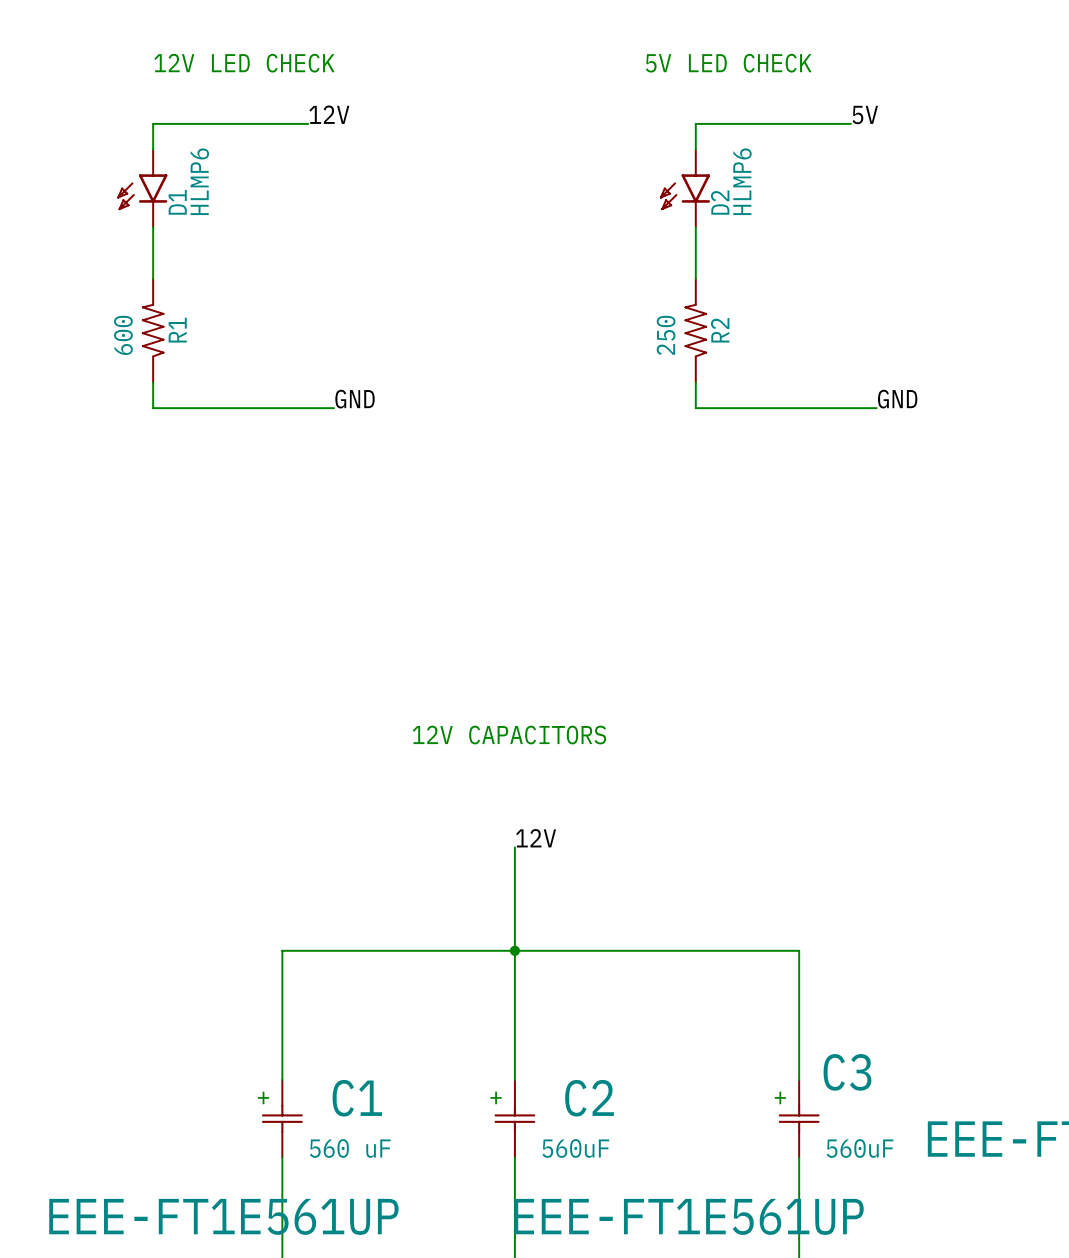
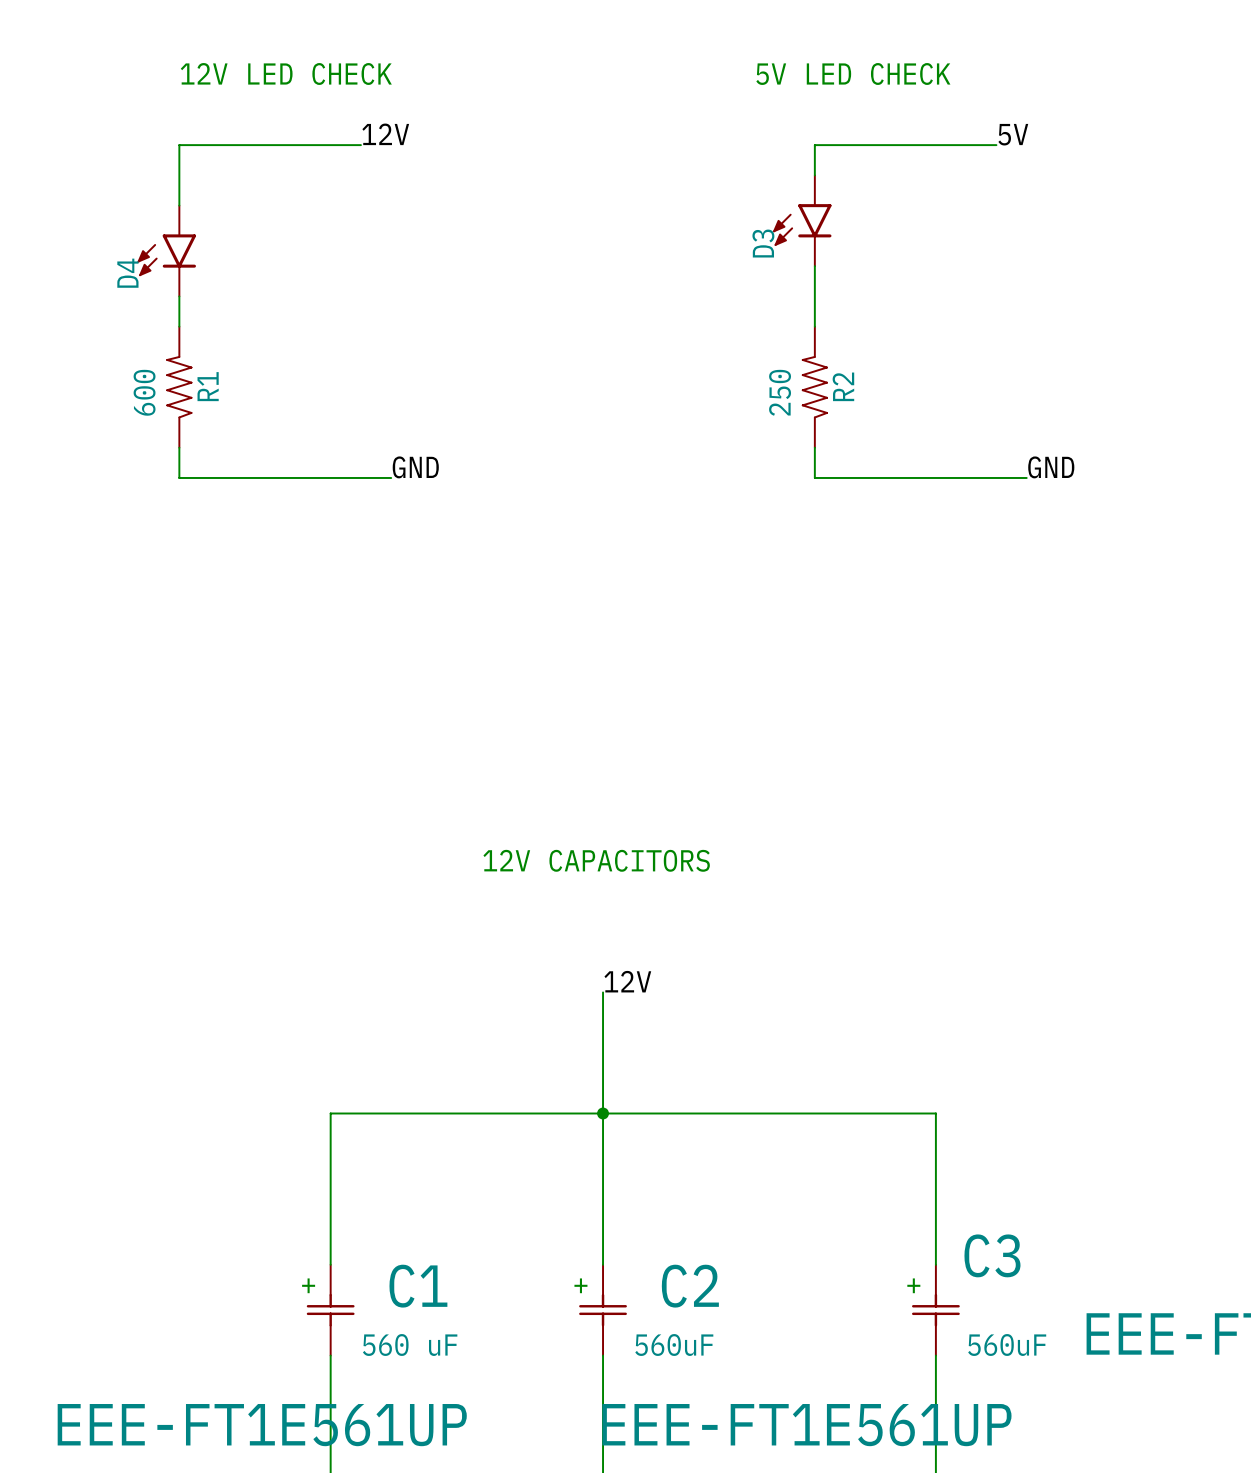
D1: HLMP6 (142, 188) -> none
D2: HLMP6 (685, 188) -> none
D3: none -> (802, 220)
D4: none -> (166, 251)

